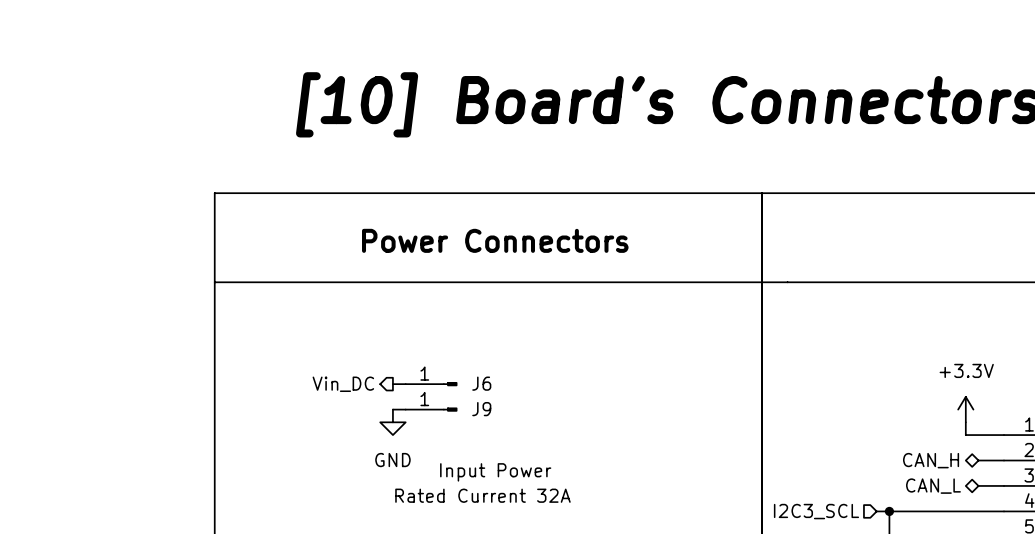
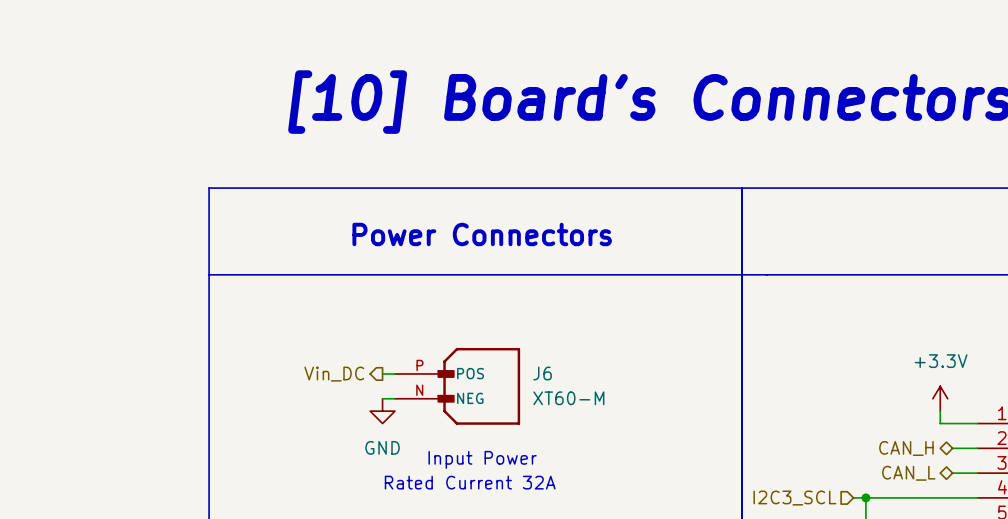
J6 symbol: [405, 382, 458, 387] -> [394, 347, 521, 425]
J6 name position: J6 (481, 383) -> J6 (542, 373)
J9: (431, 409) -> none
J6 value: none -> XT60-M (568, 398)

